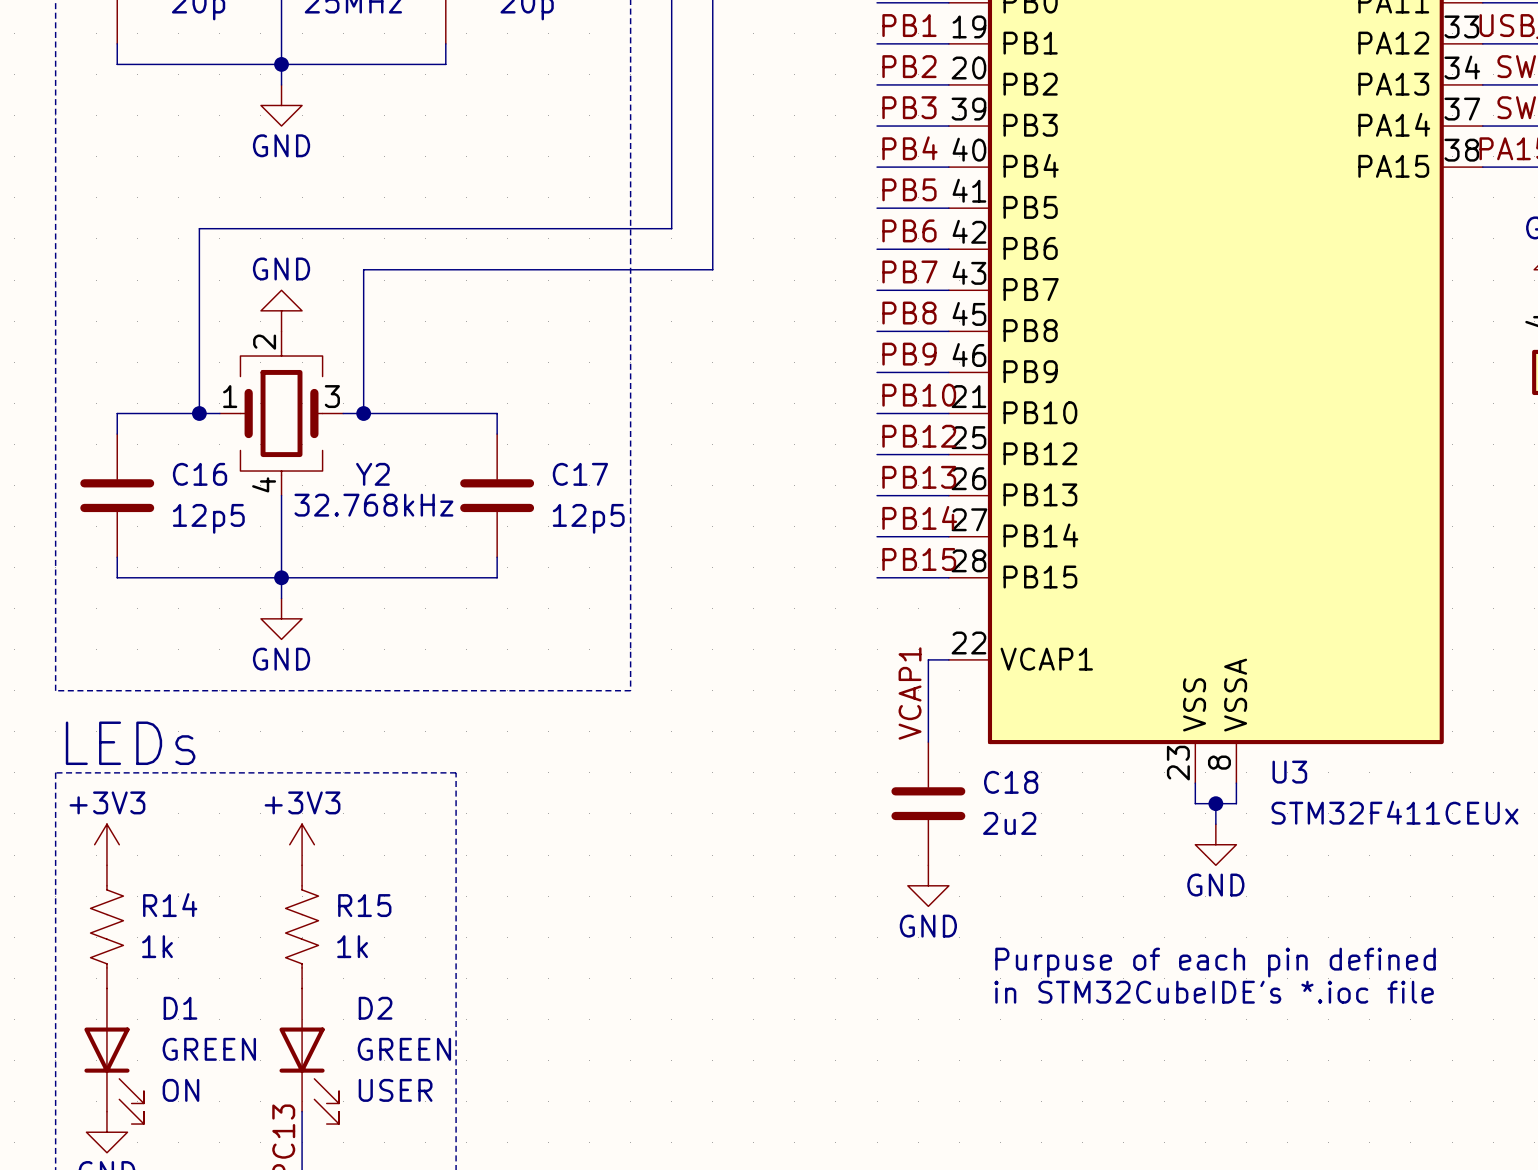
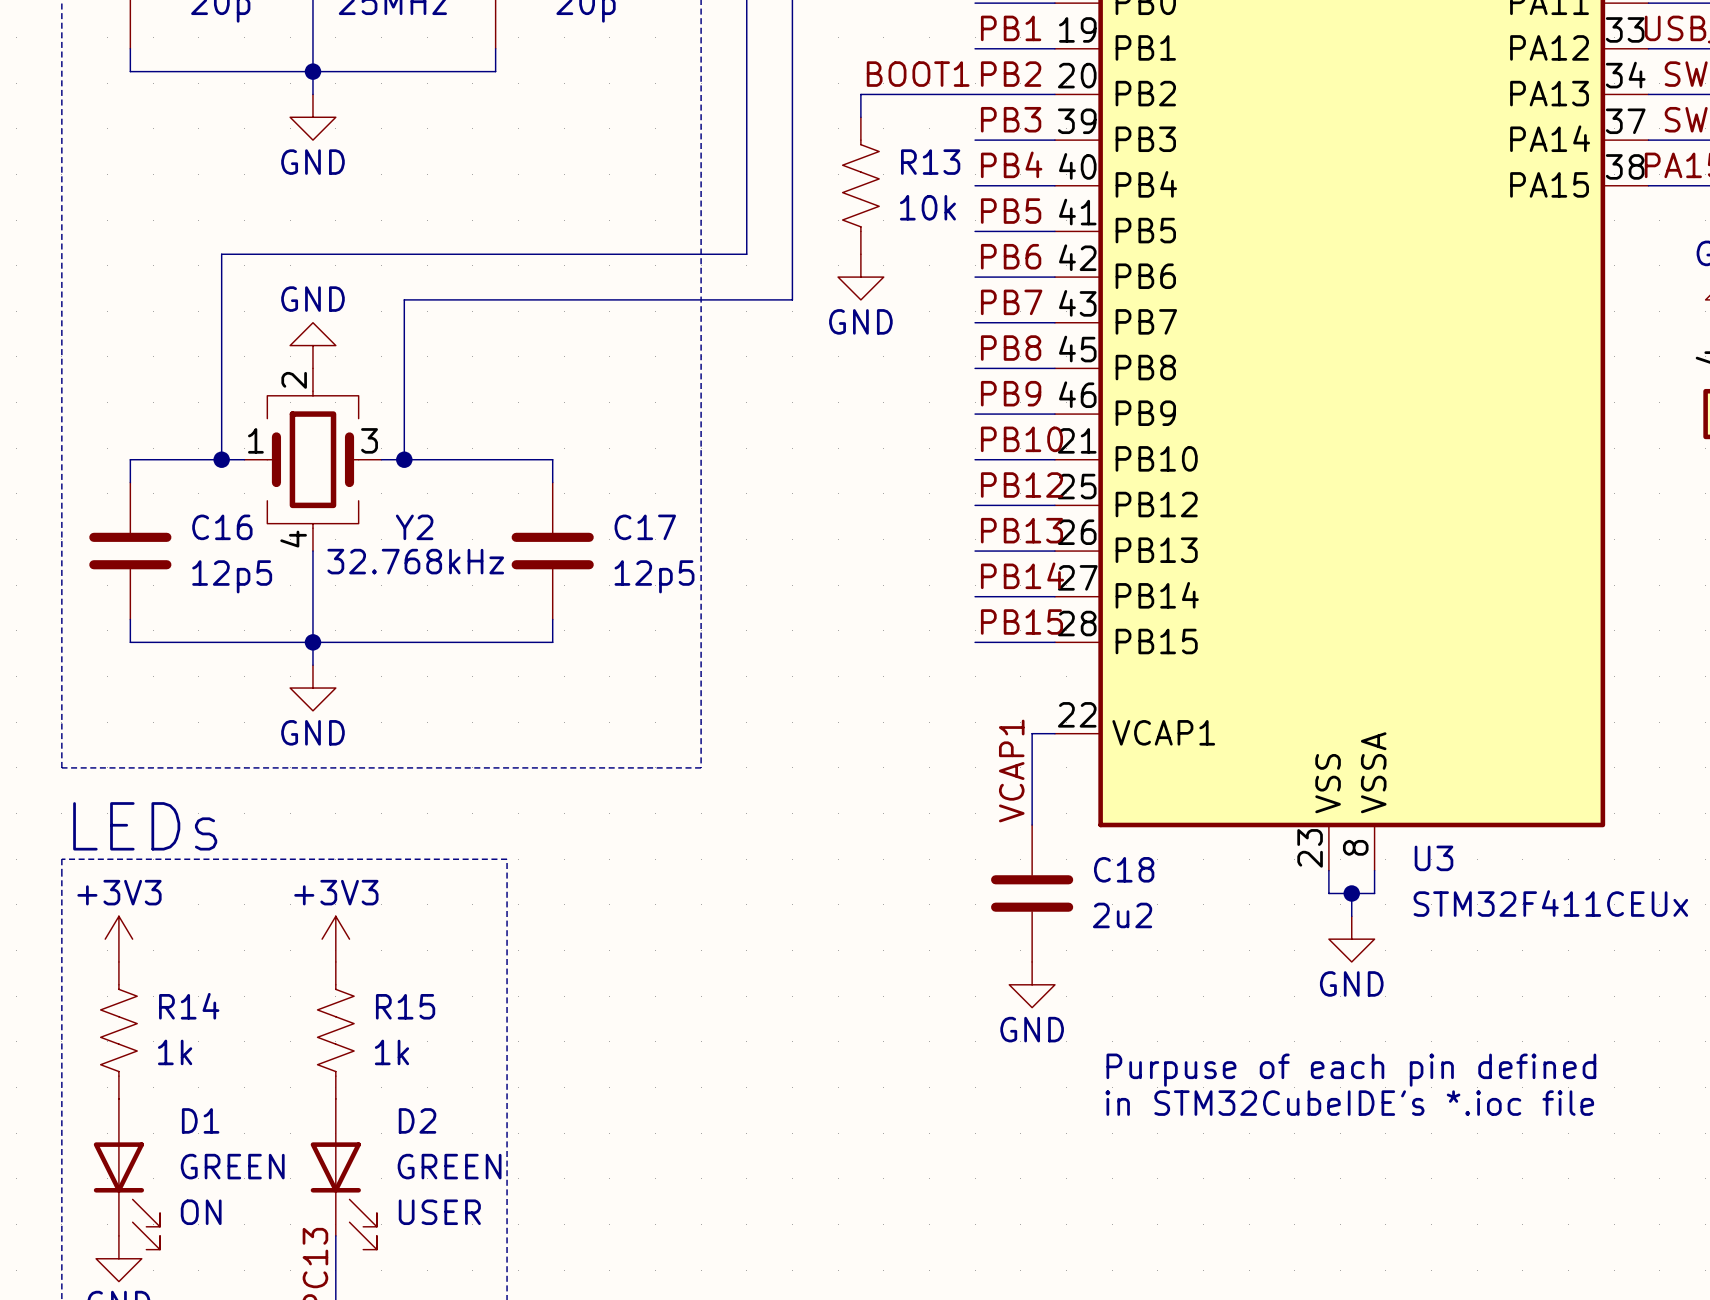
label: none -> BOOT1 (918, 74)
wire: none -> (975, 94) (860, 94) (860, 117)
R13: none -> 10k (860, 185)
power symbol: none -> GND (860, 277)

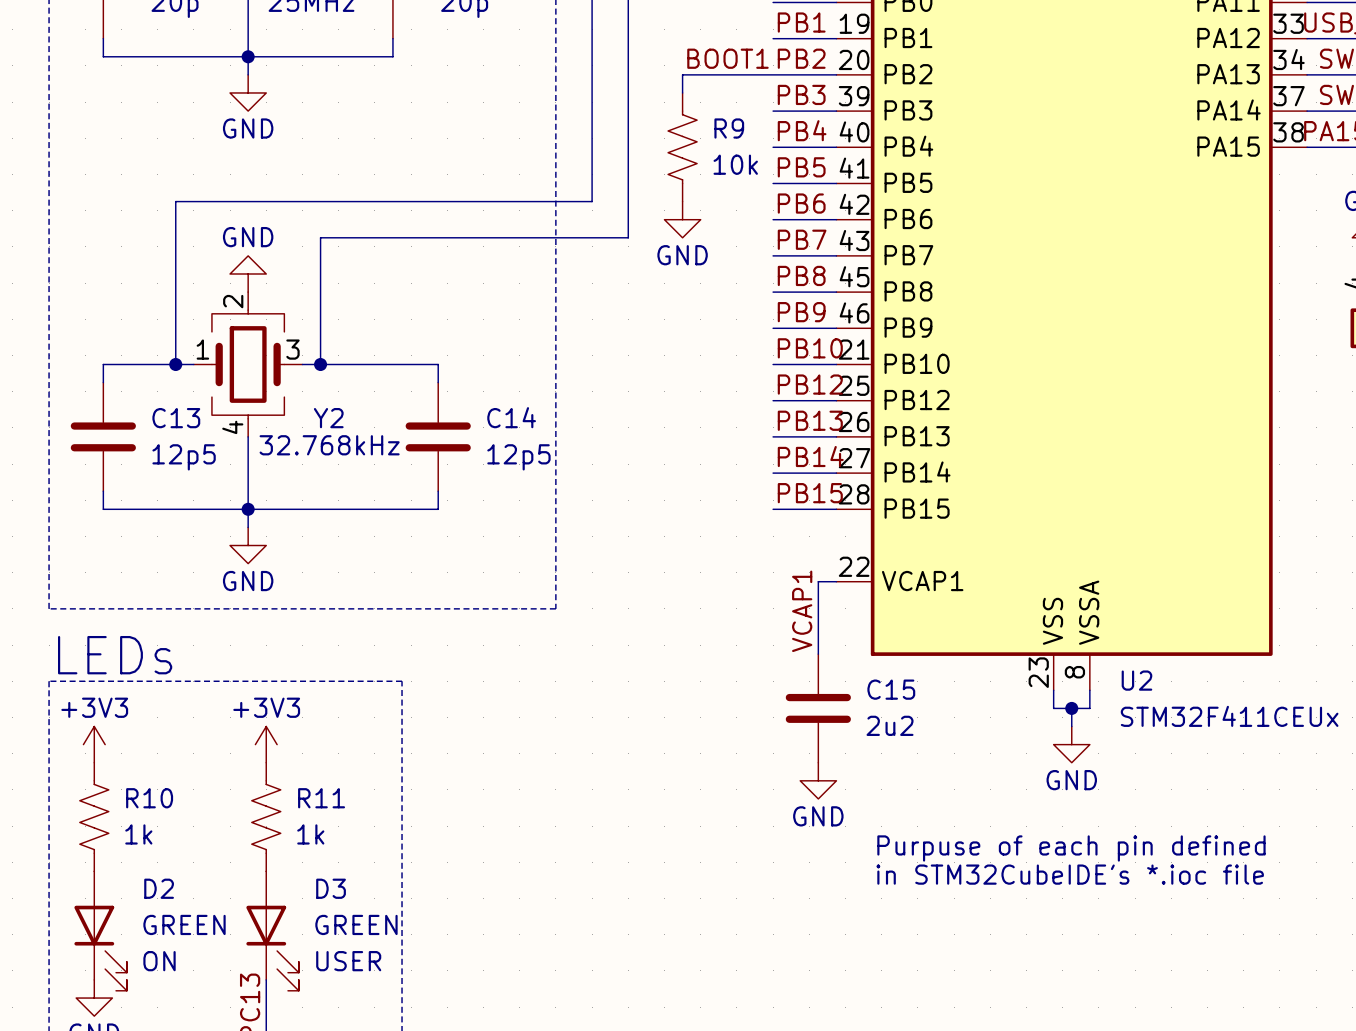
R13 name: R13 (930, 162) -> R9 (729, 128)
C16 name: C16 (222, 527) -> C13 (176, 418)
C17 name: C17 (645, 527) -> C14 (511, 417)
U3 name: U3 (1433, 858) -> U2 (1136, 680)
C18 name: C18 (1124, 869) -> C15 (891, 689)
R14 name: R14 (189, 1006) -> R10 (149, 798)
R15 name: R15 (405, 1006) -> R11 (321, 798)
D1 name: D1 (200, 1120) -> D2 (159, 888)
D2 name: D2 (417, 1120) -> D3 (331, 888)

